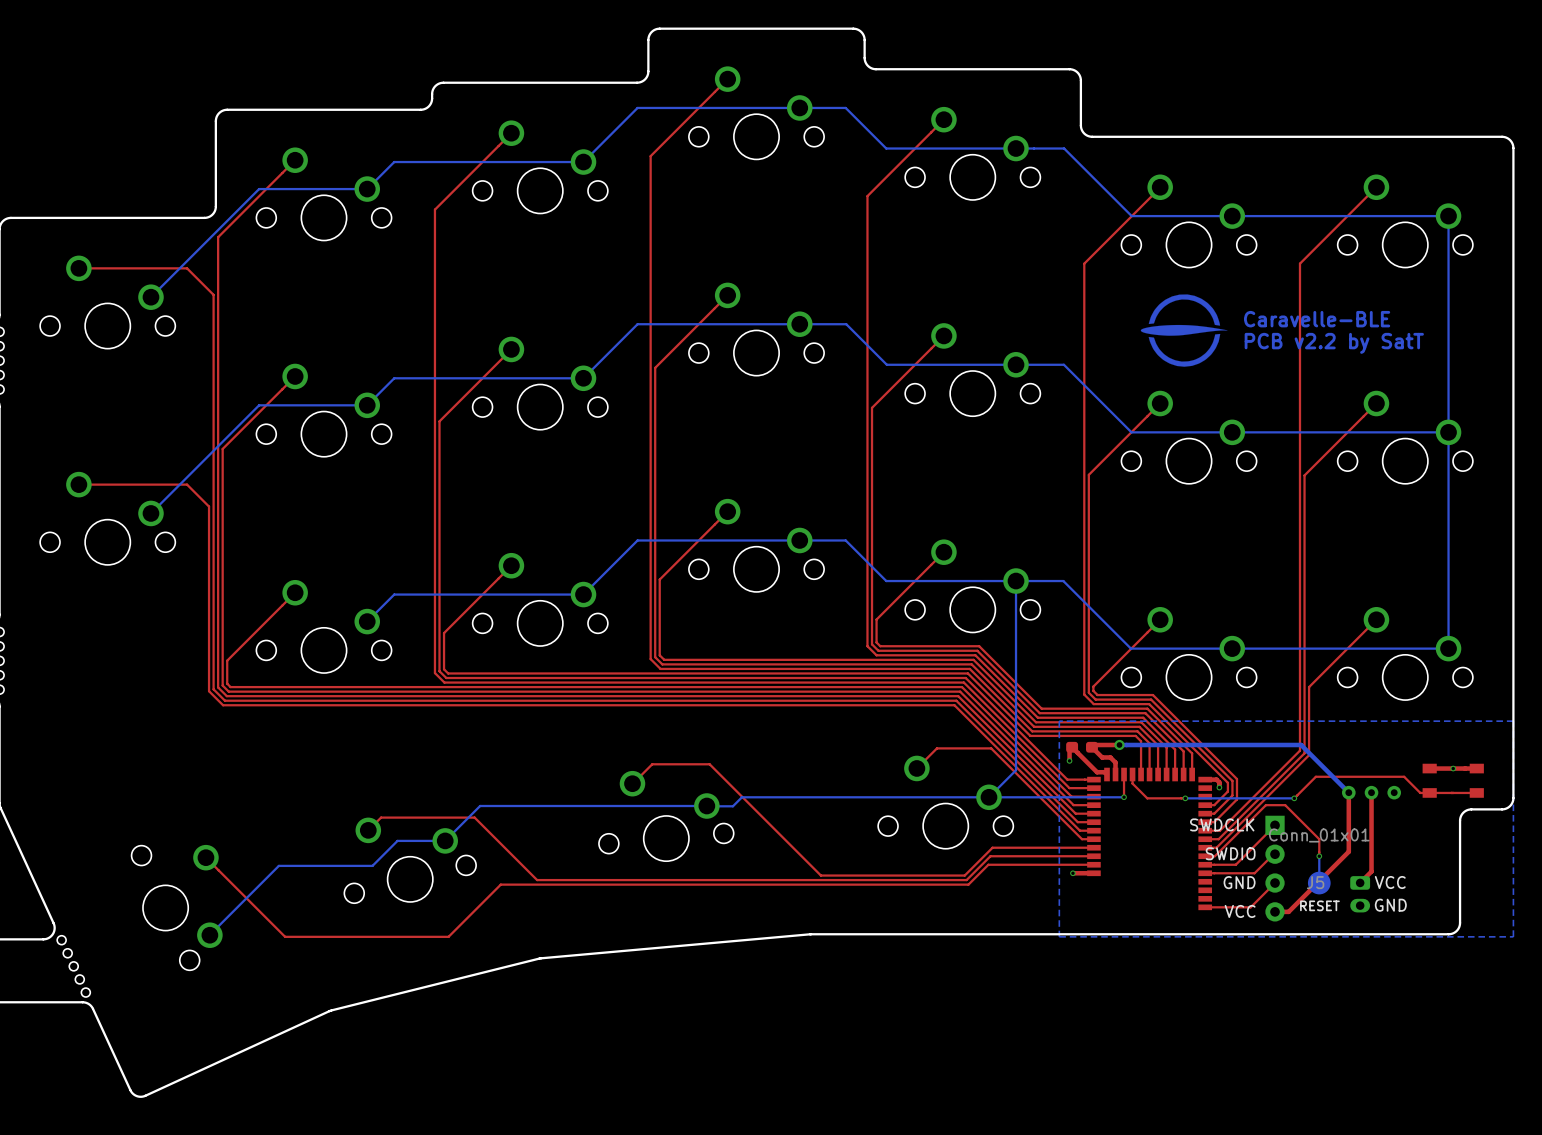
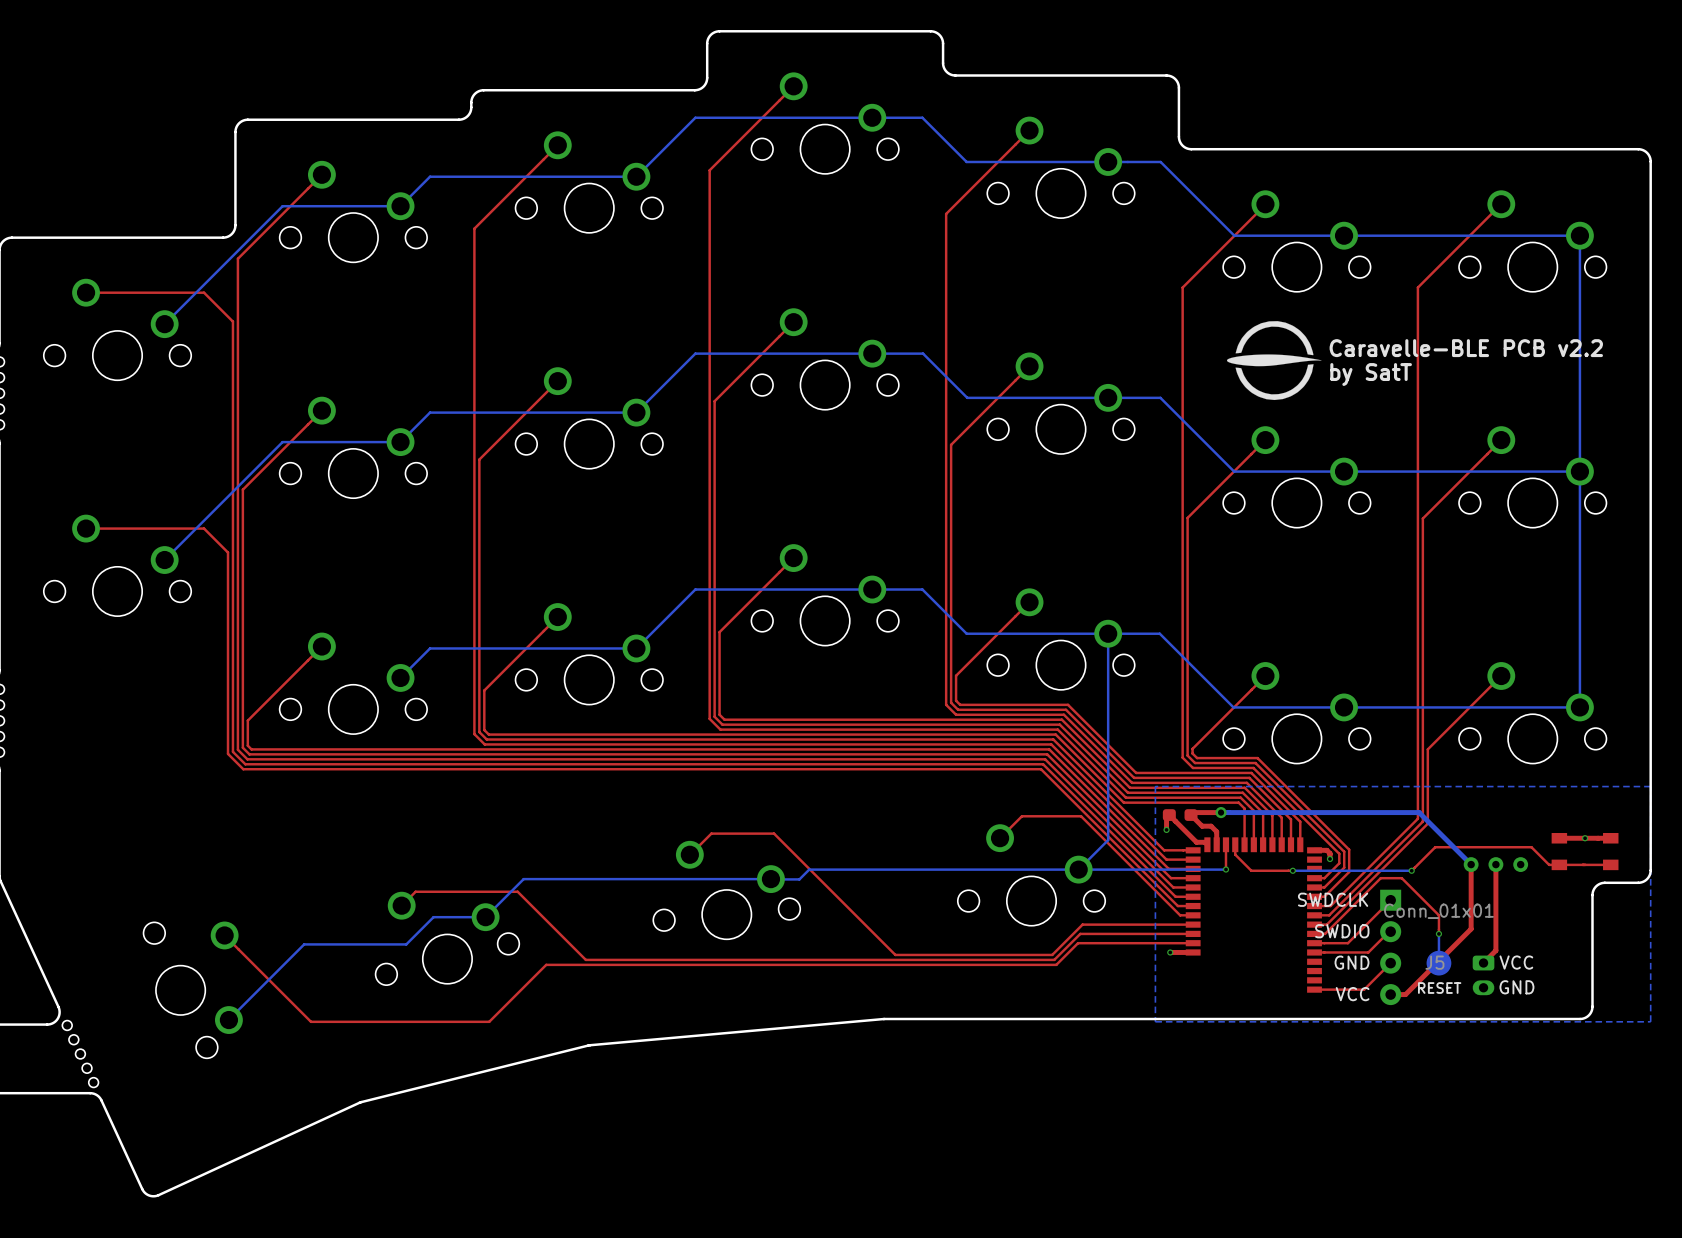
drawing: none -> [1226, 321, 1322, 401]
drawing: [1140, 294, 1228, 367] -> none
text: Caravelle-BLE (1317, 319) -> Caravelle-BLE PCB v2.2 (1466, 348)
text: PCB v2.2 by SatT (1334, 343) -> by SatT (1371, 374)

